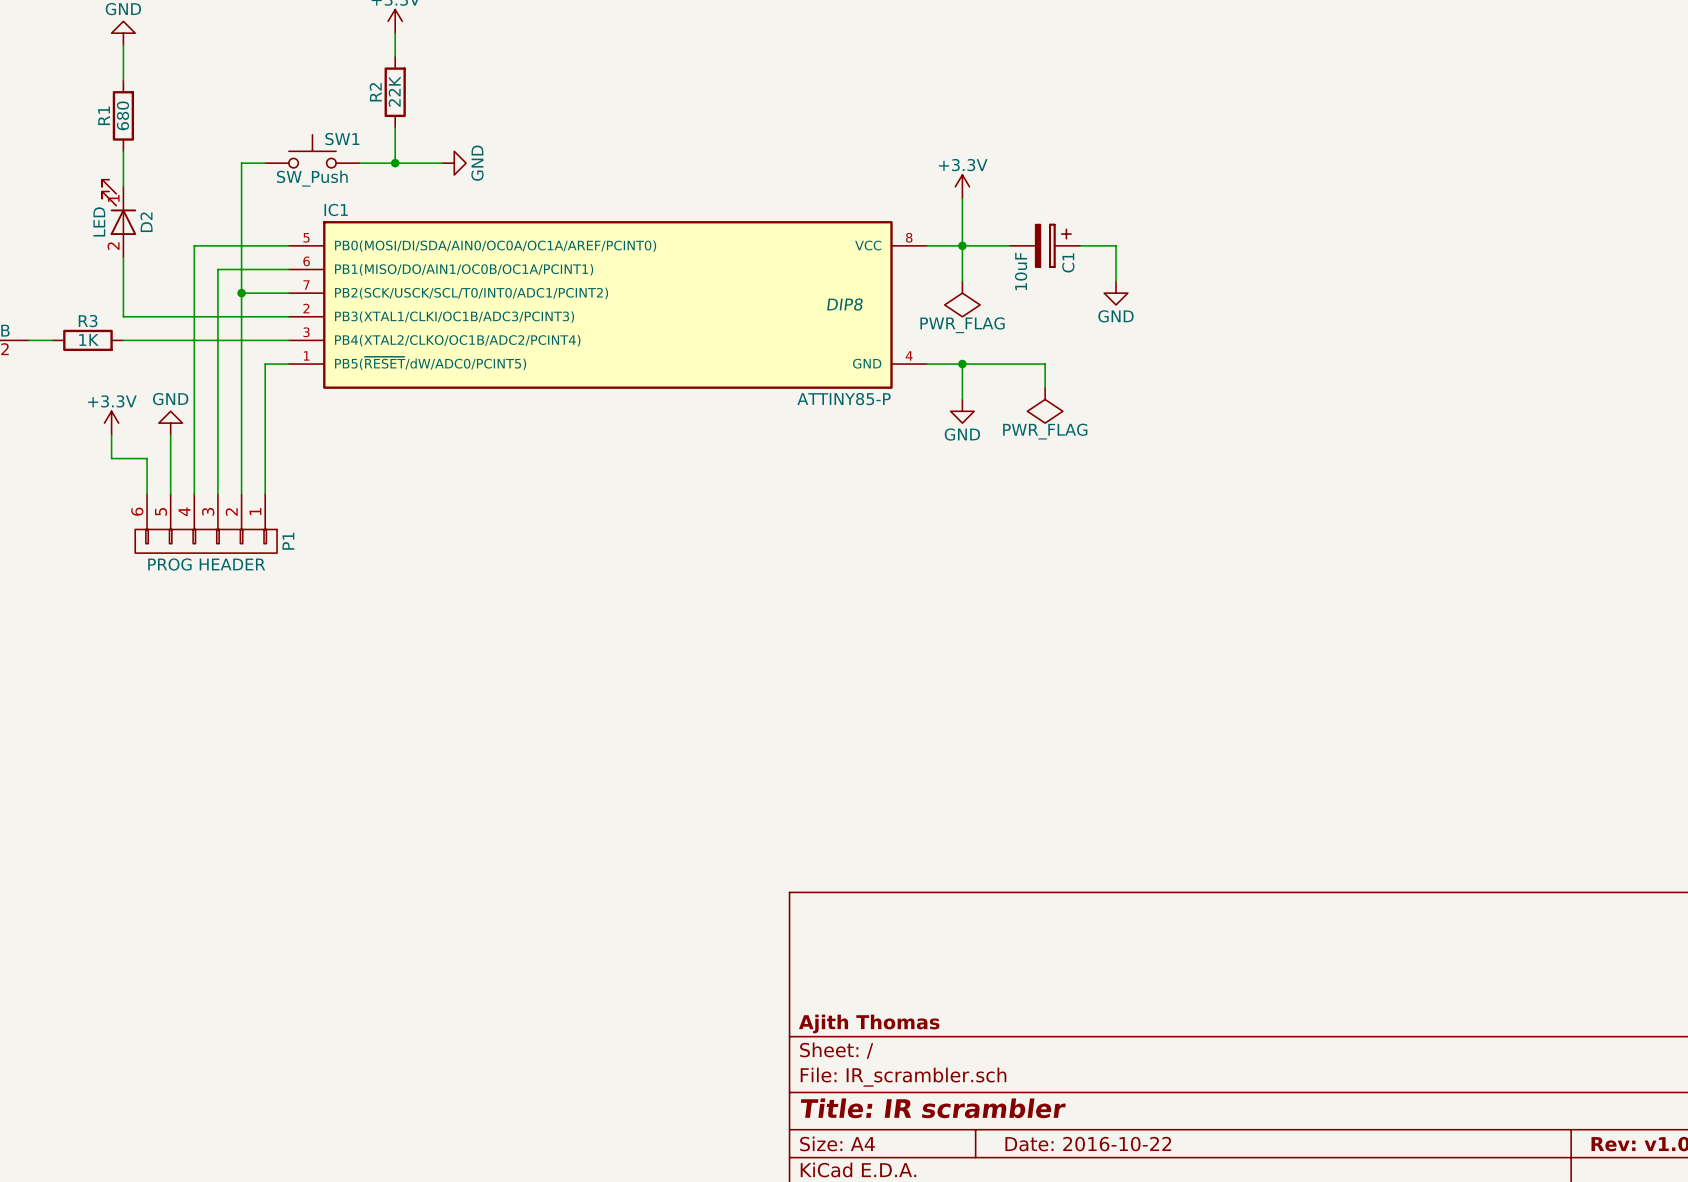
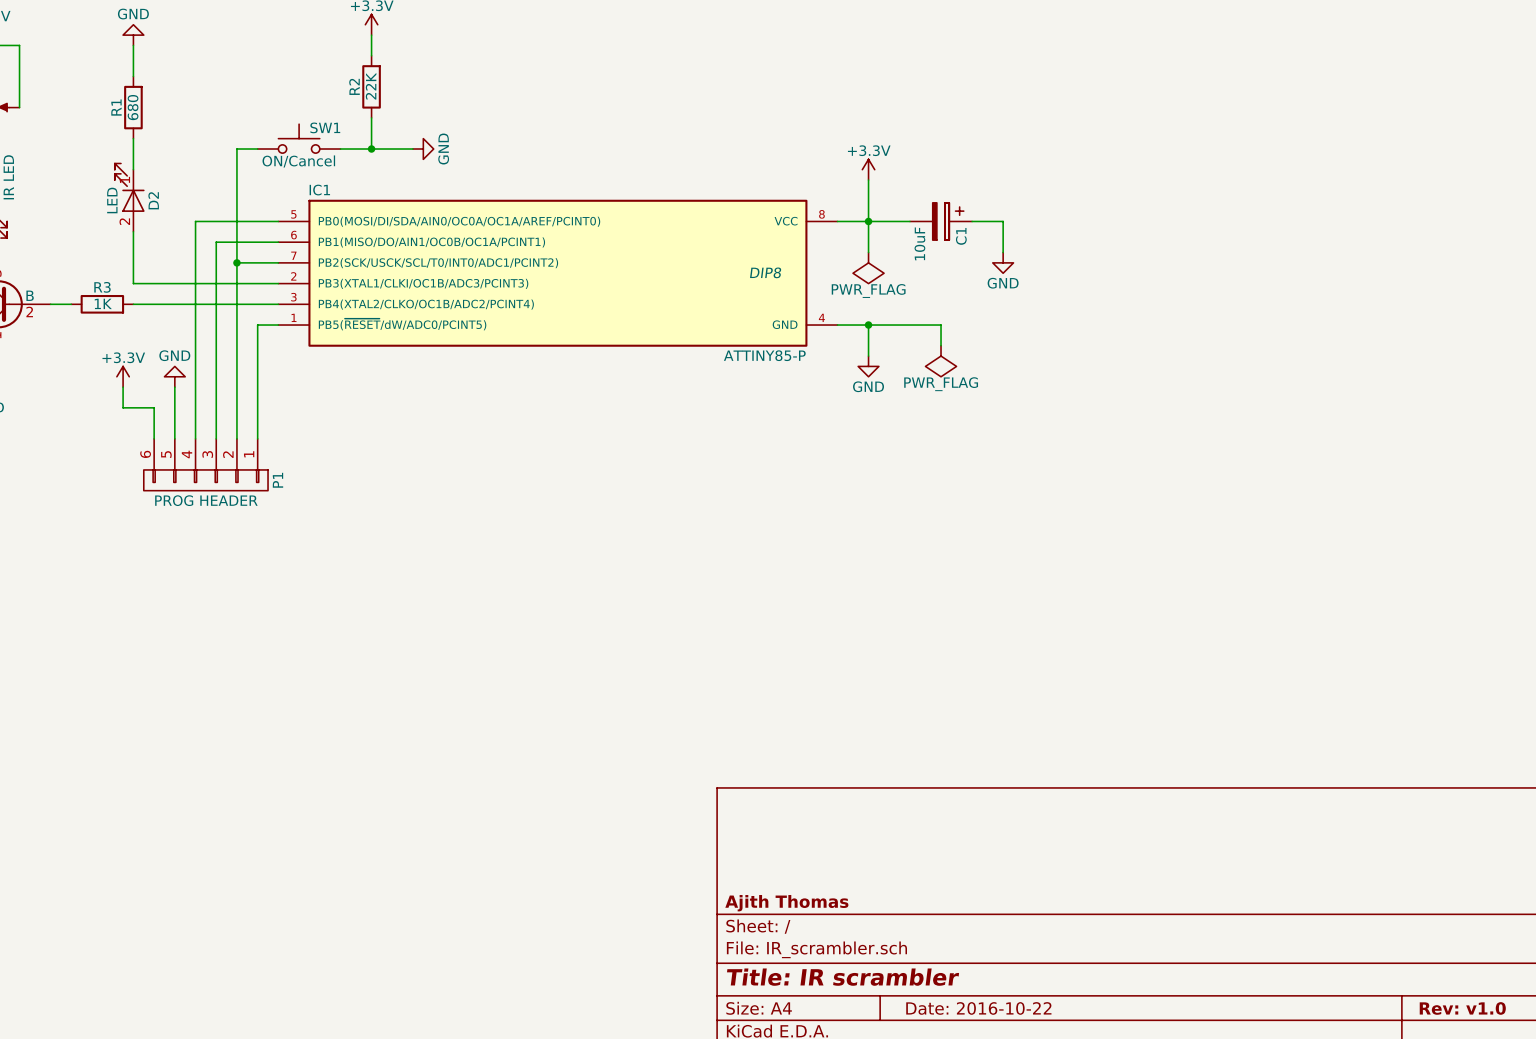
SW1 value: SW_Push (312, 178) -> ON/Cancel (298, 161)

